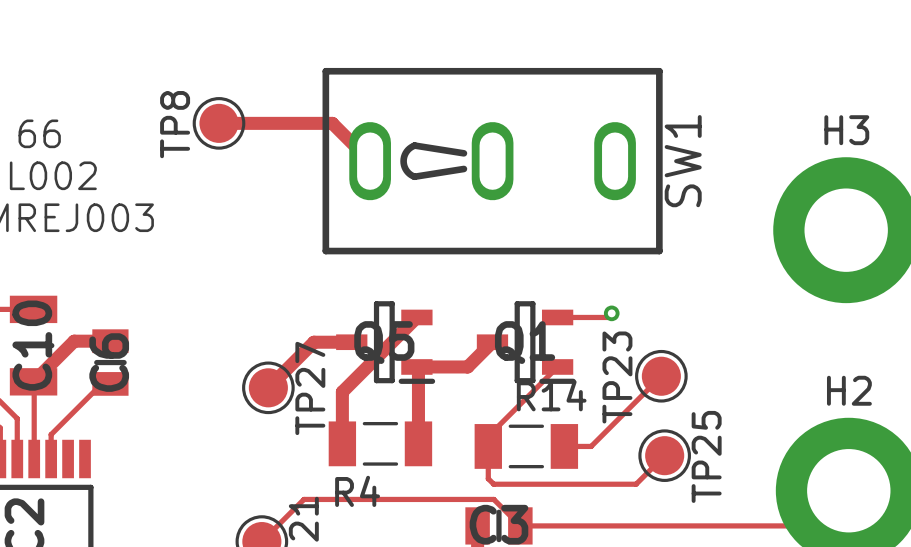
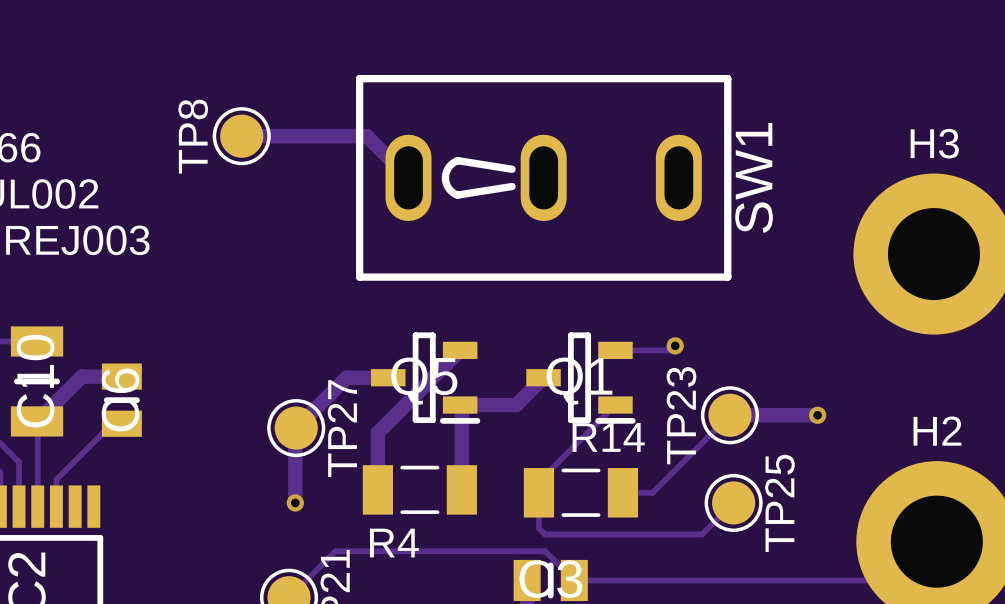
track: none -> (729, 415) (817, 415)
via: none -> (817, 415)
track: none -> (296, 428) (295, 502)
via: none -> (295, 502)

